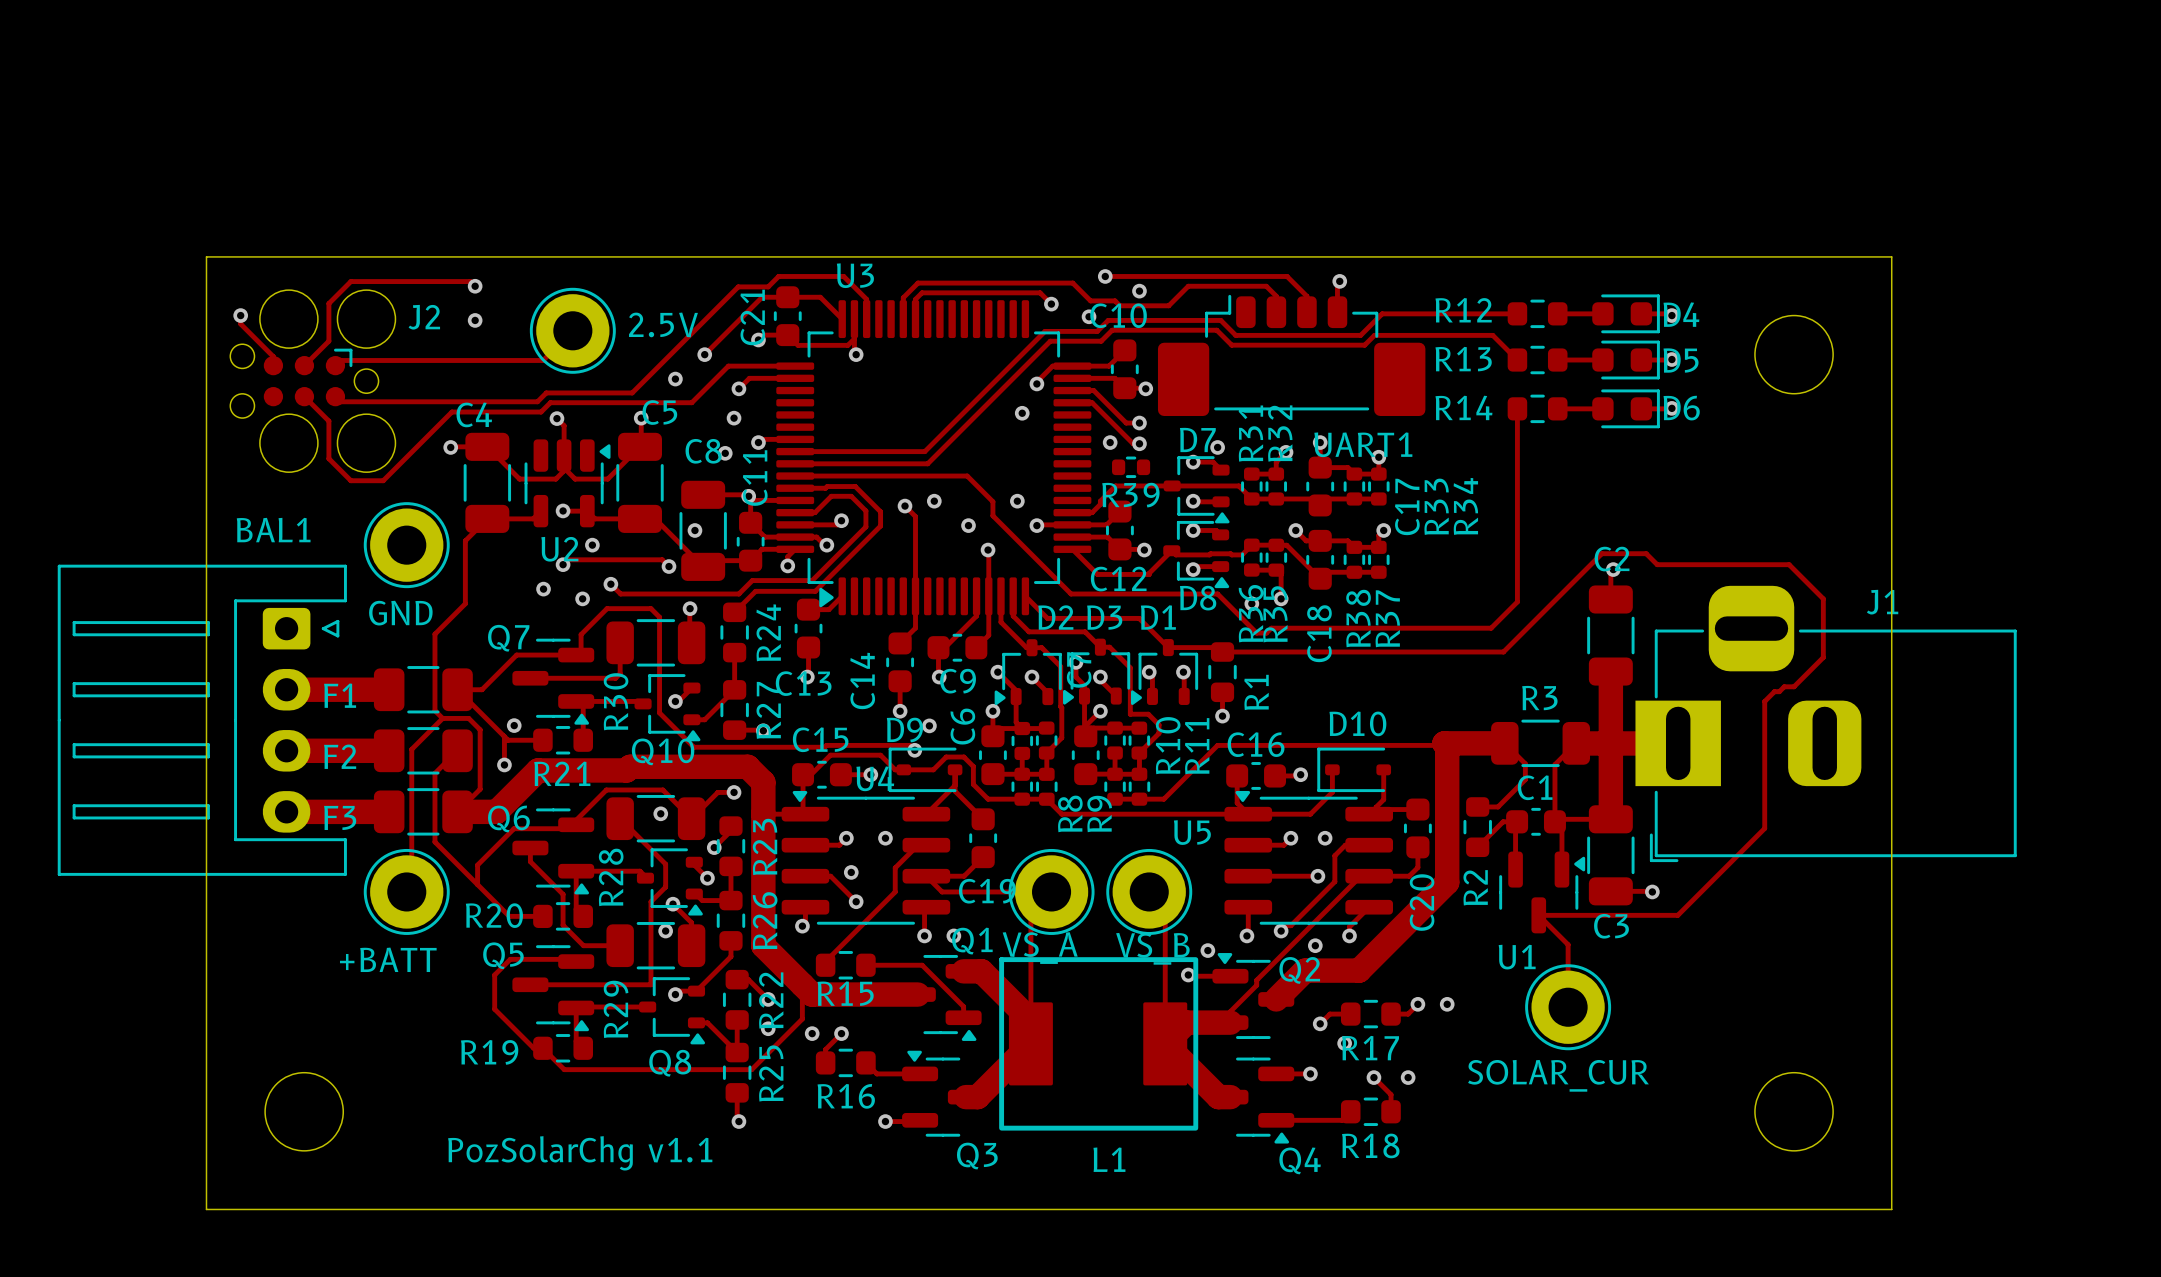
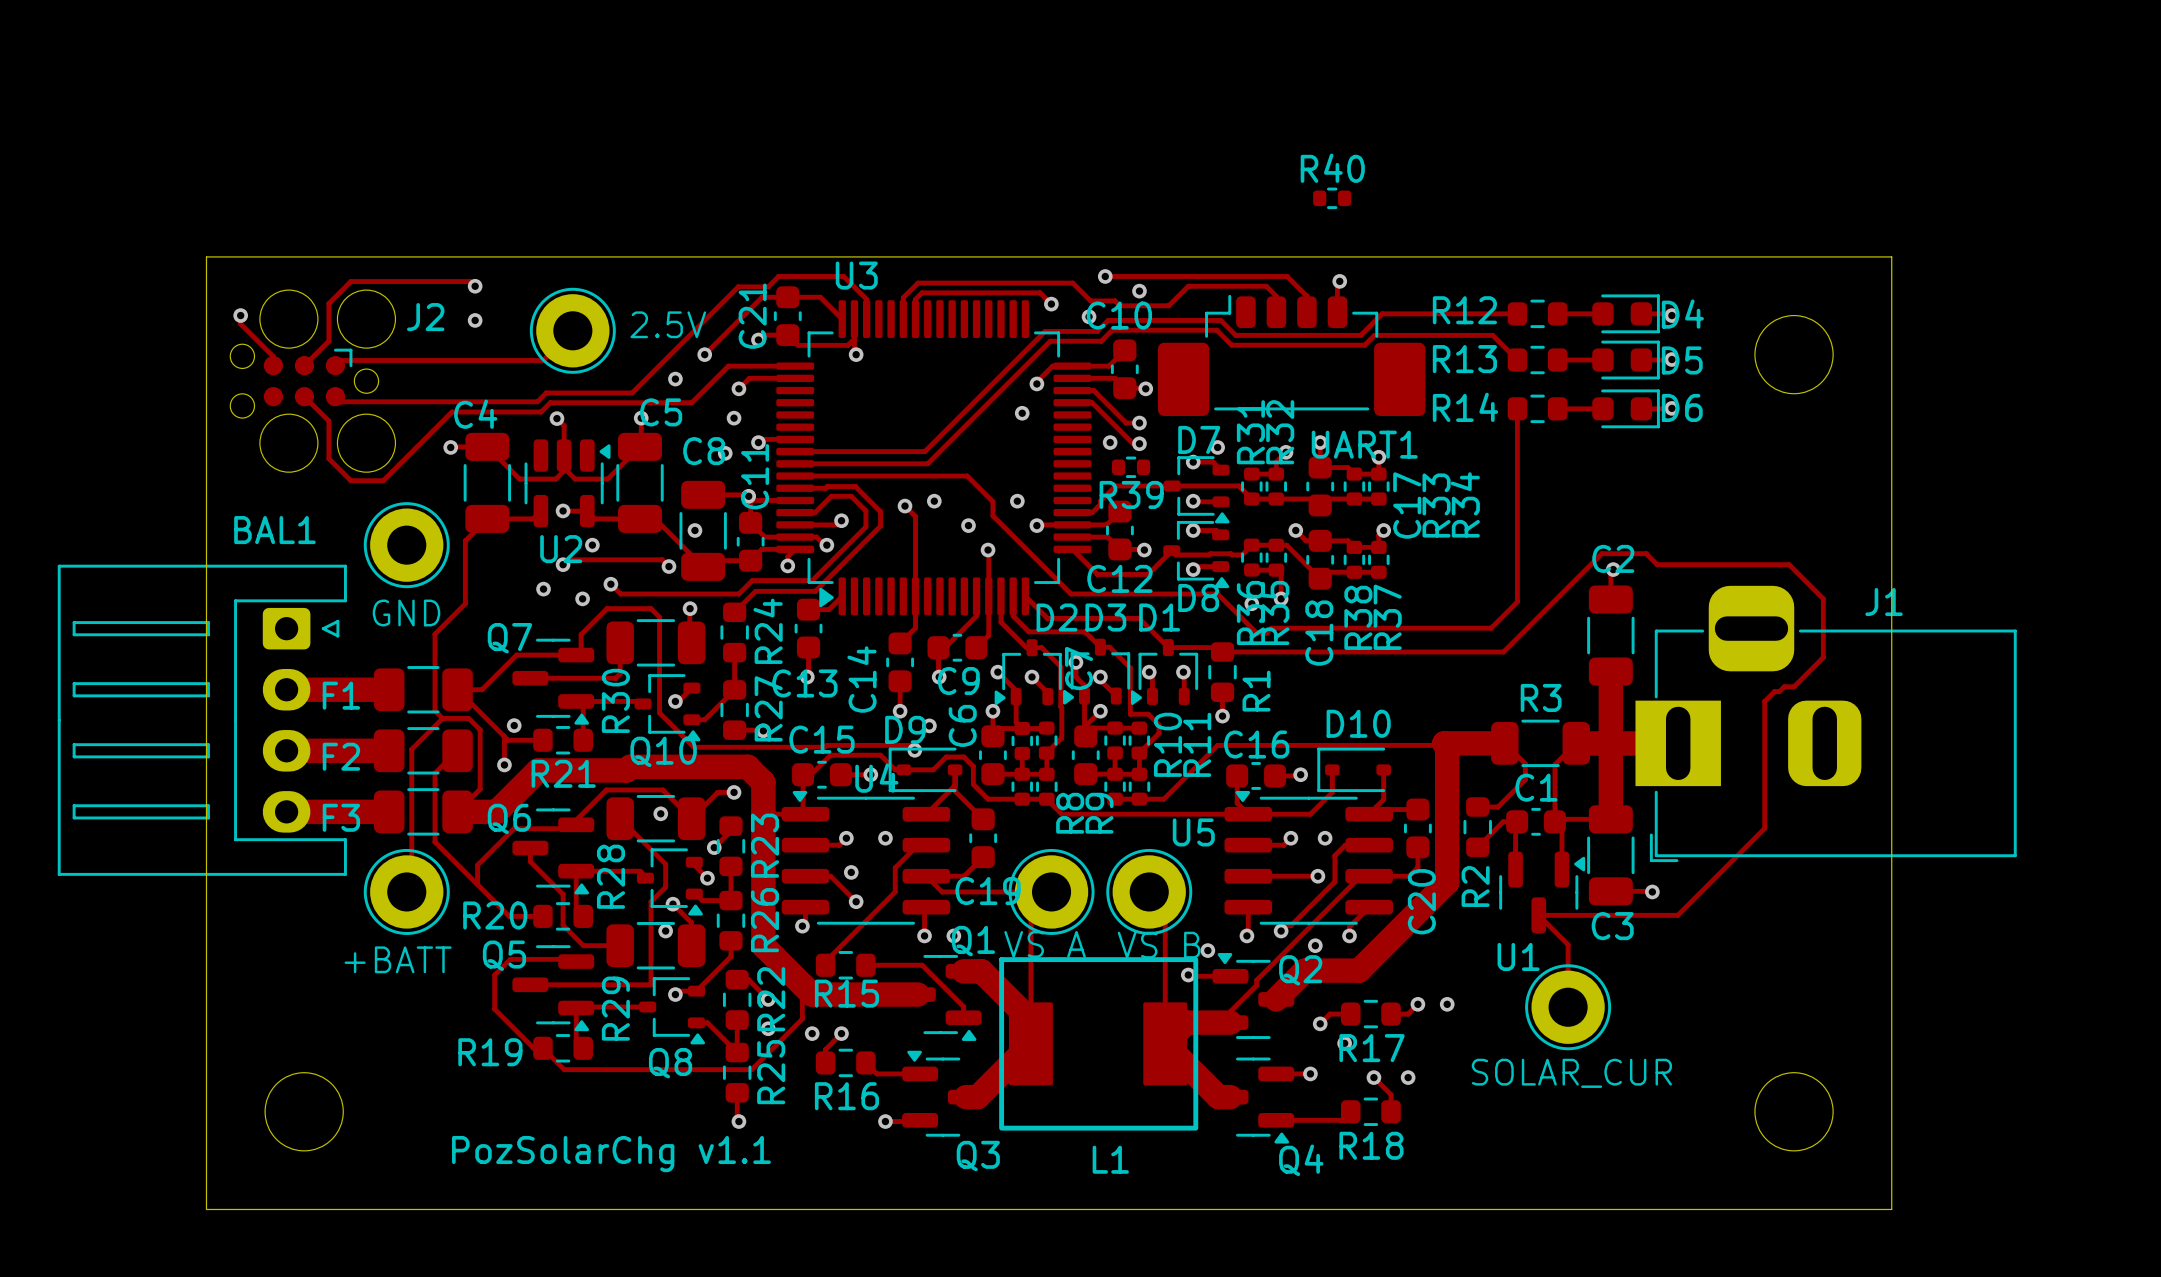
R40: none -> (1332, 198)

